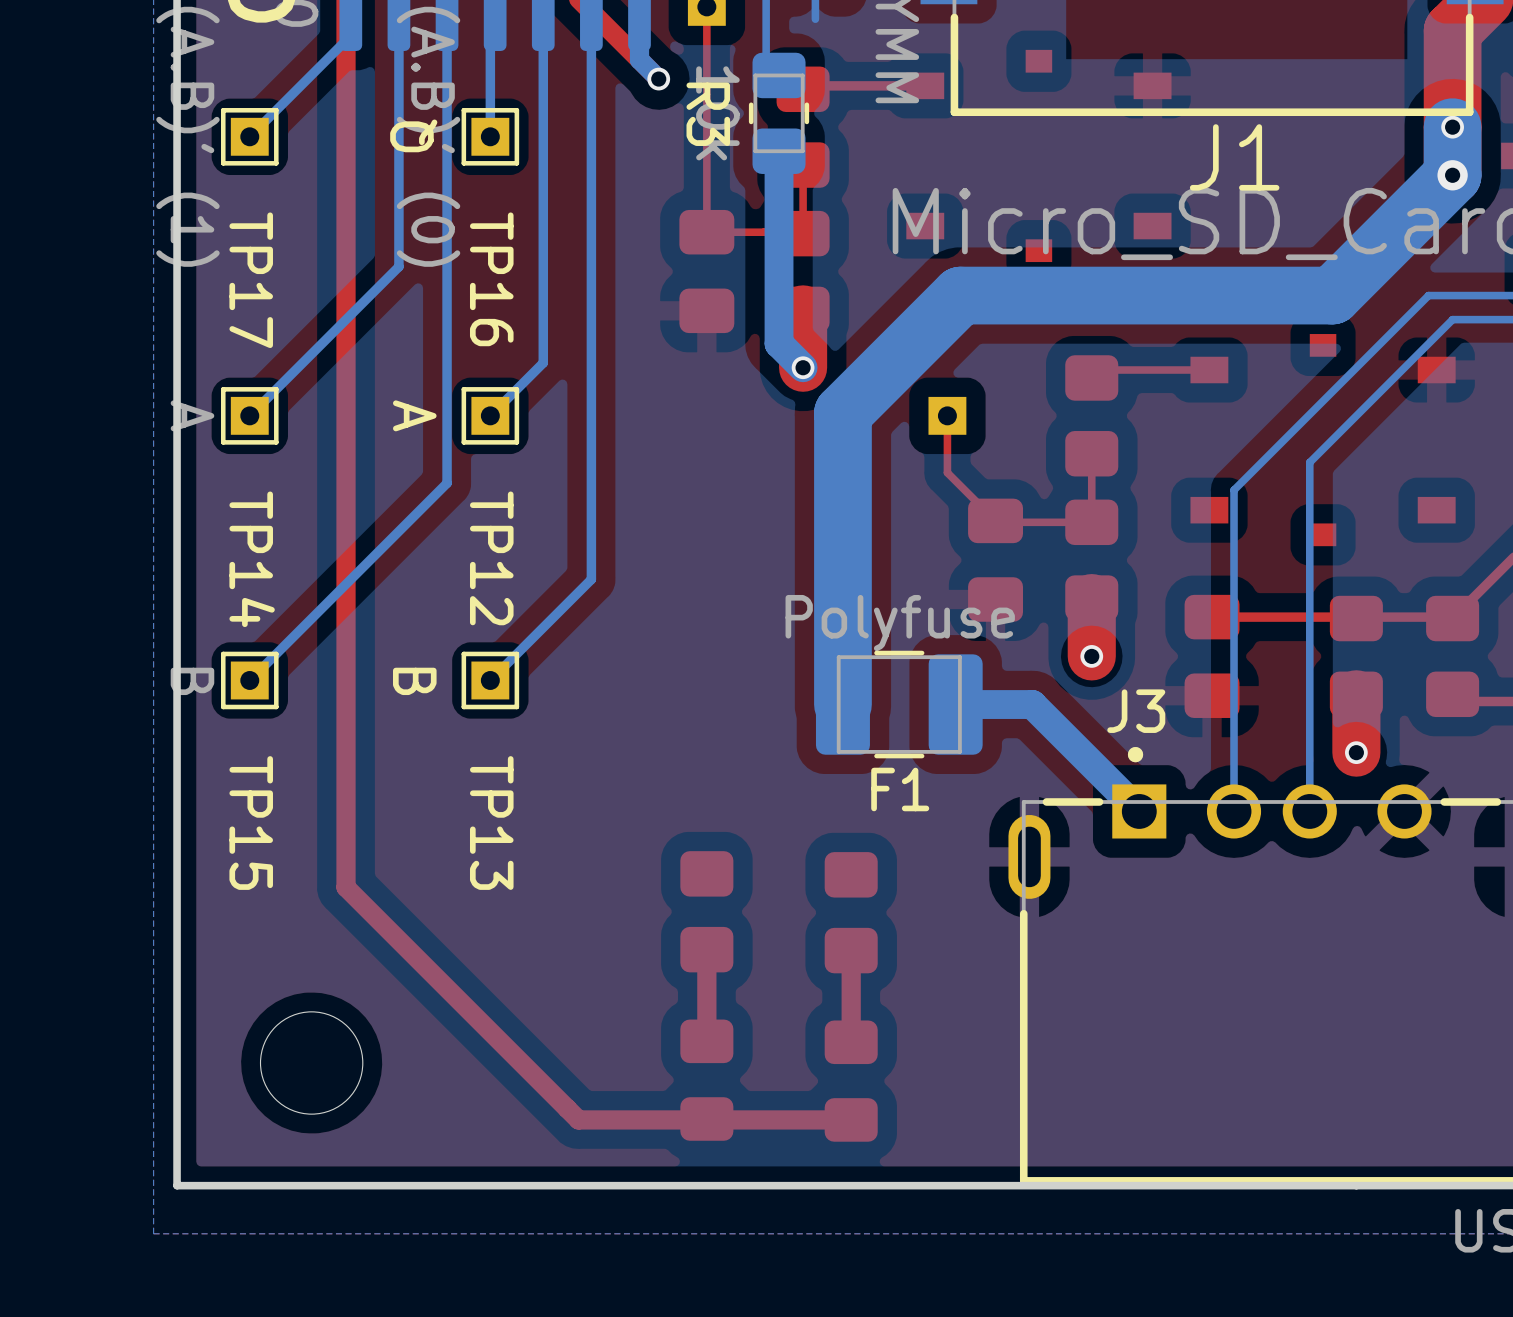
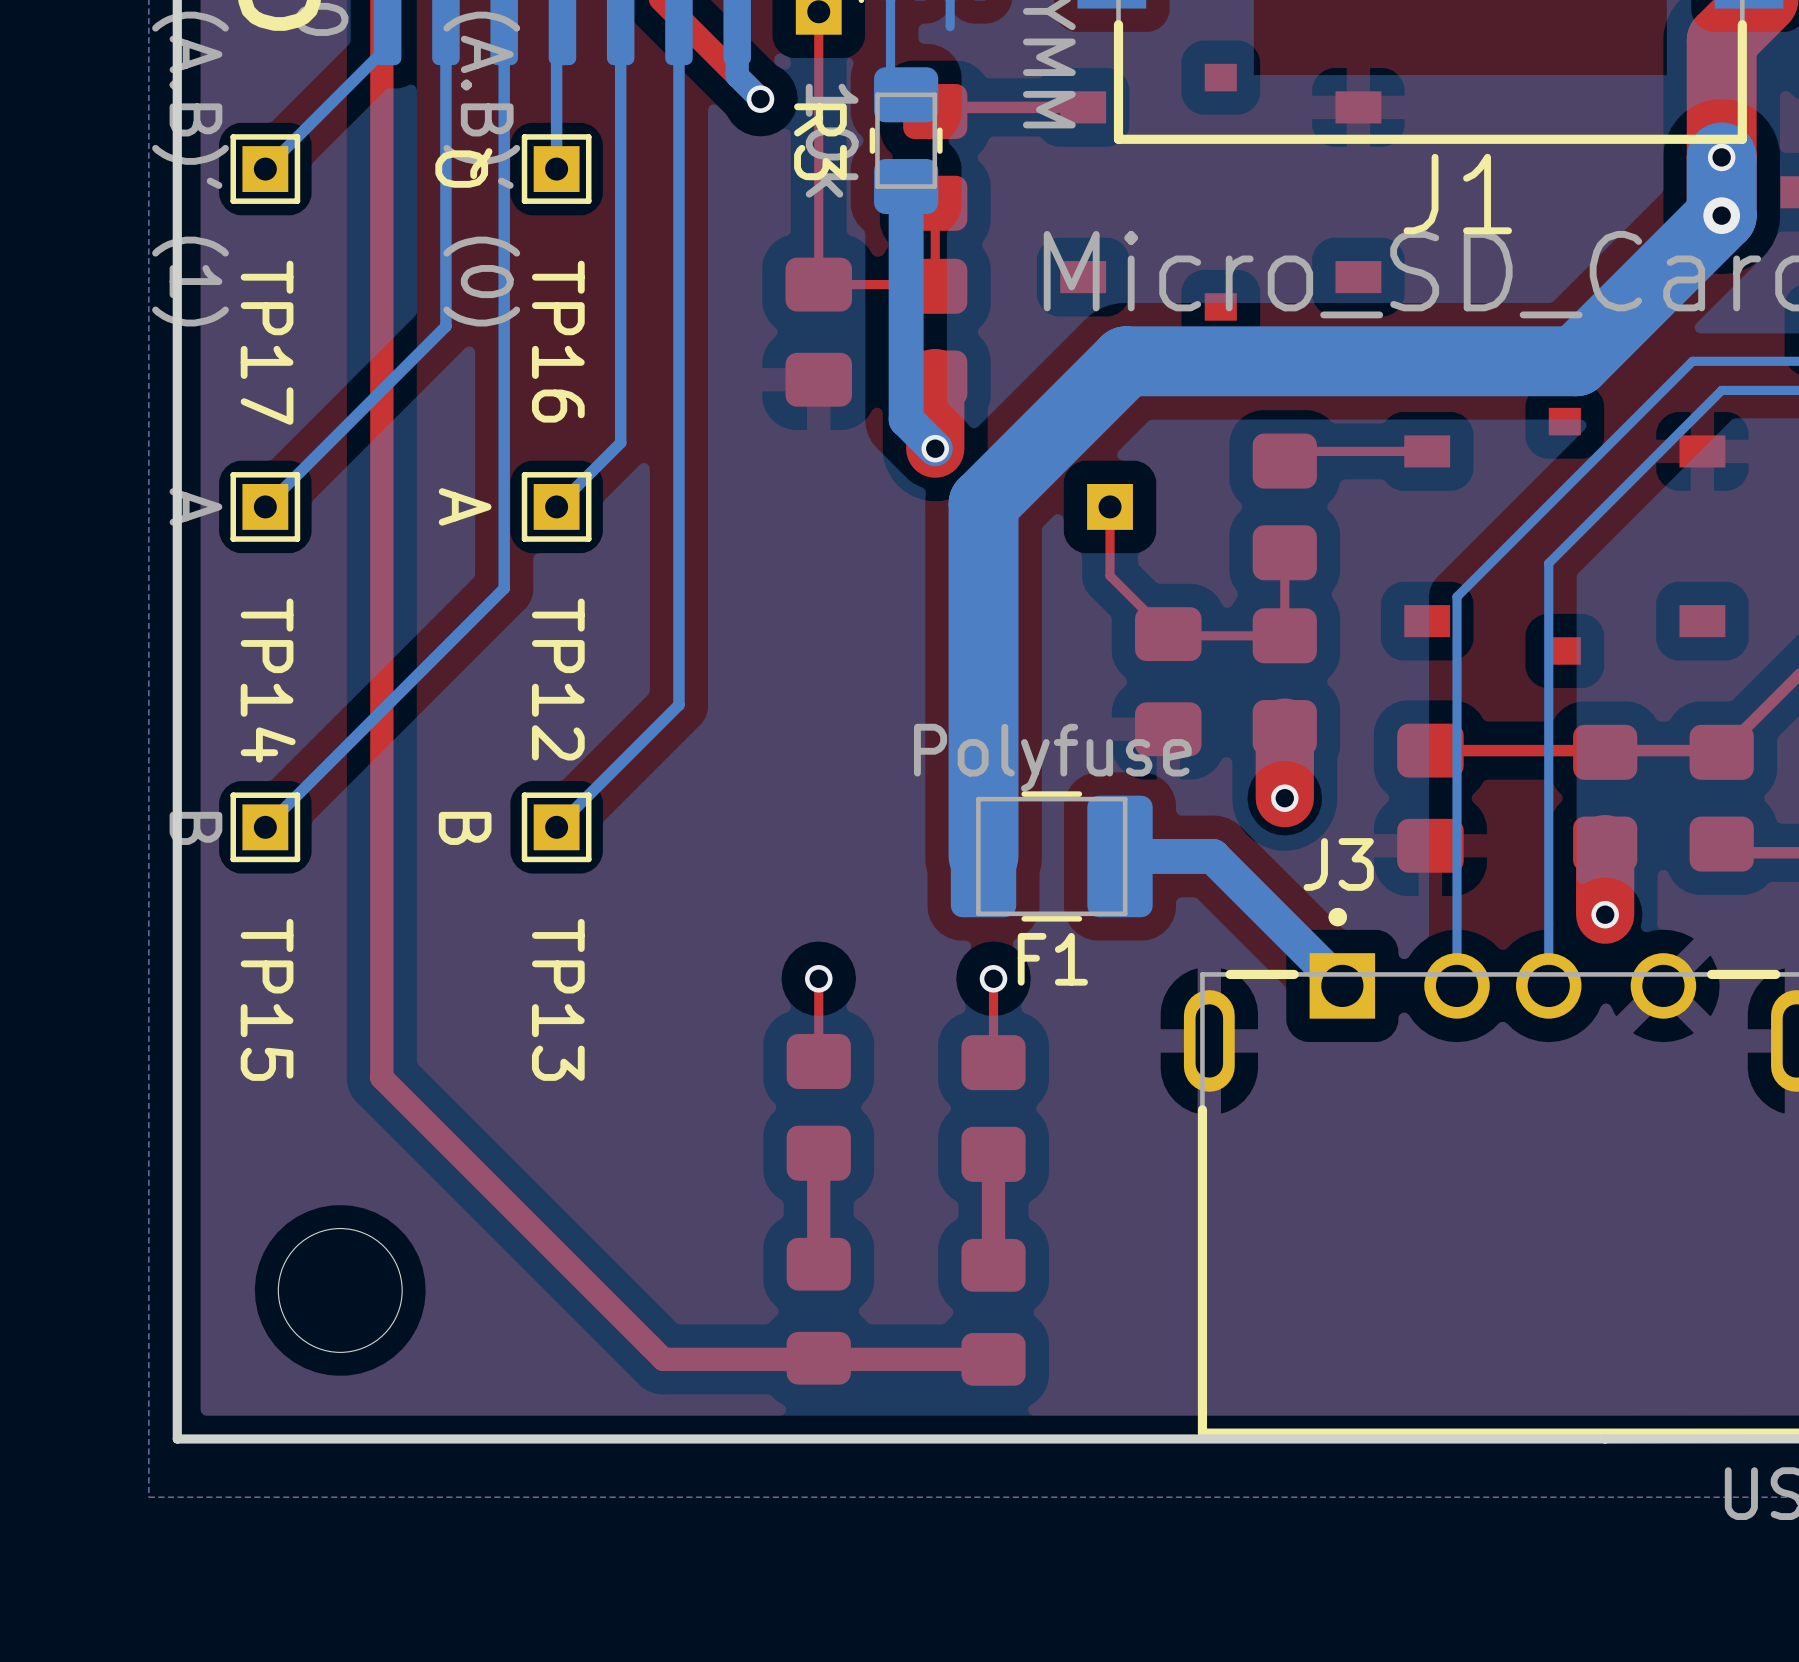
top track: none -> (818, 978) (818, 1061)
via: none -> (818, 978)
top track: none -> (993, 978) (993, 1062)
via: none -> (993, 978)

